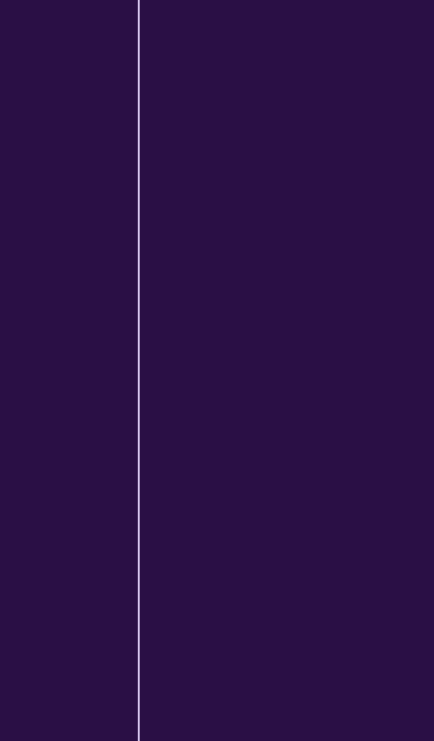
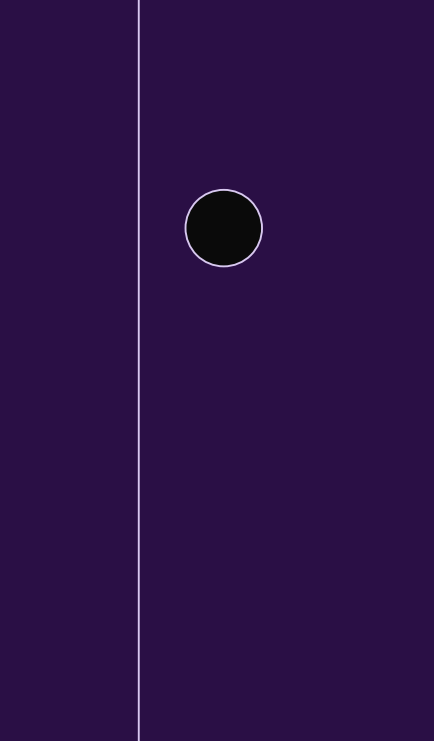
hole: none -> (223, 228)

